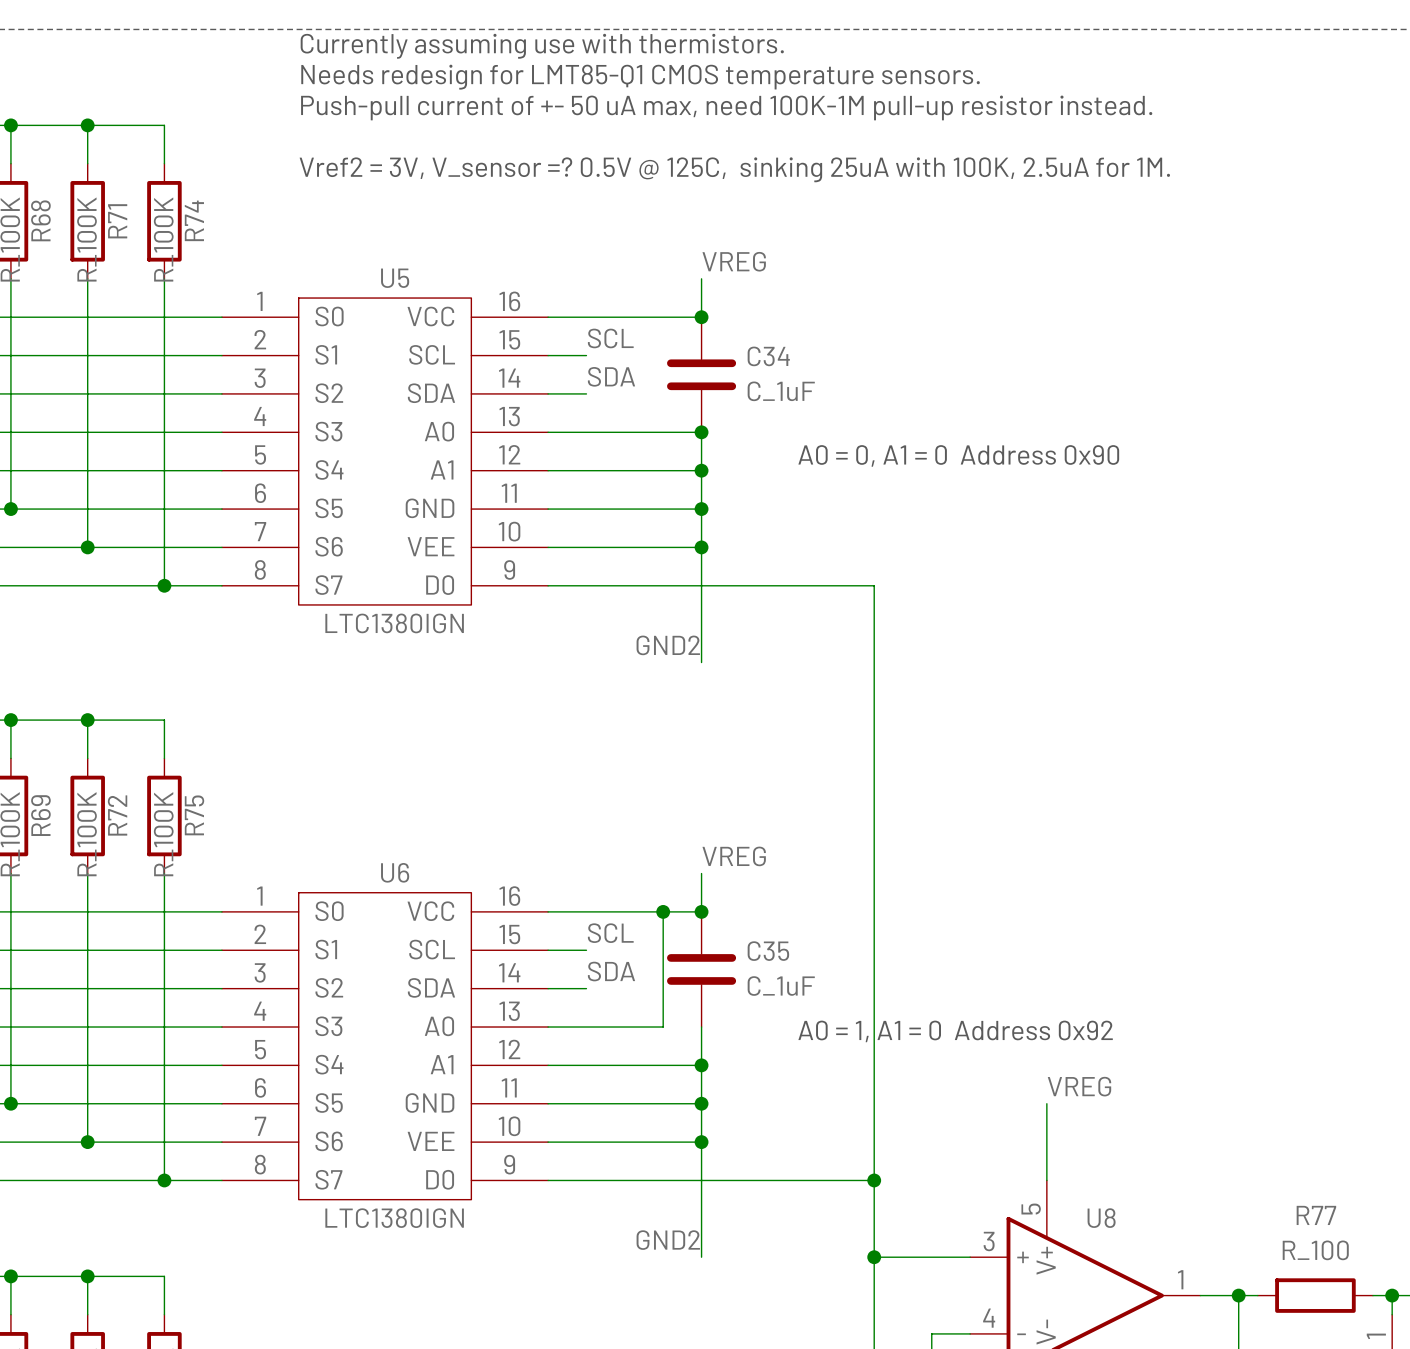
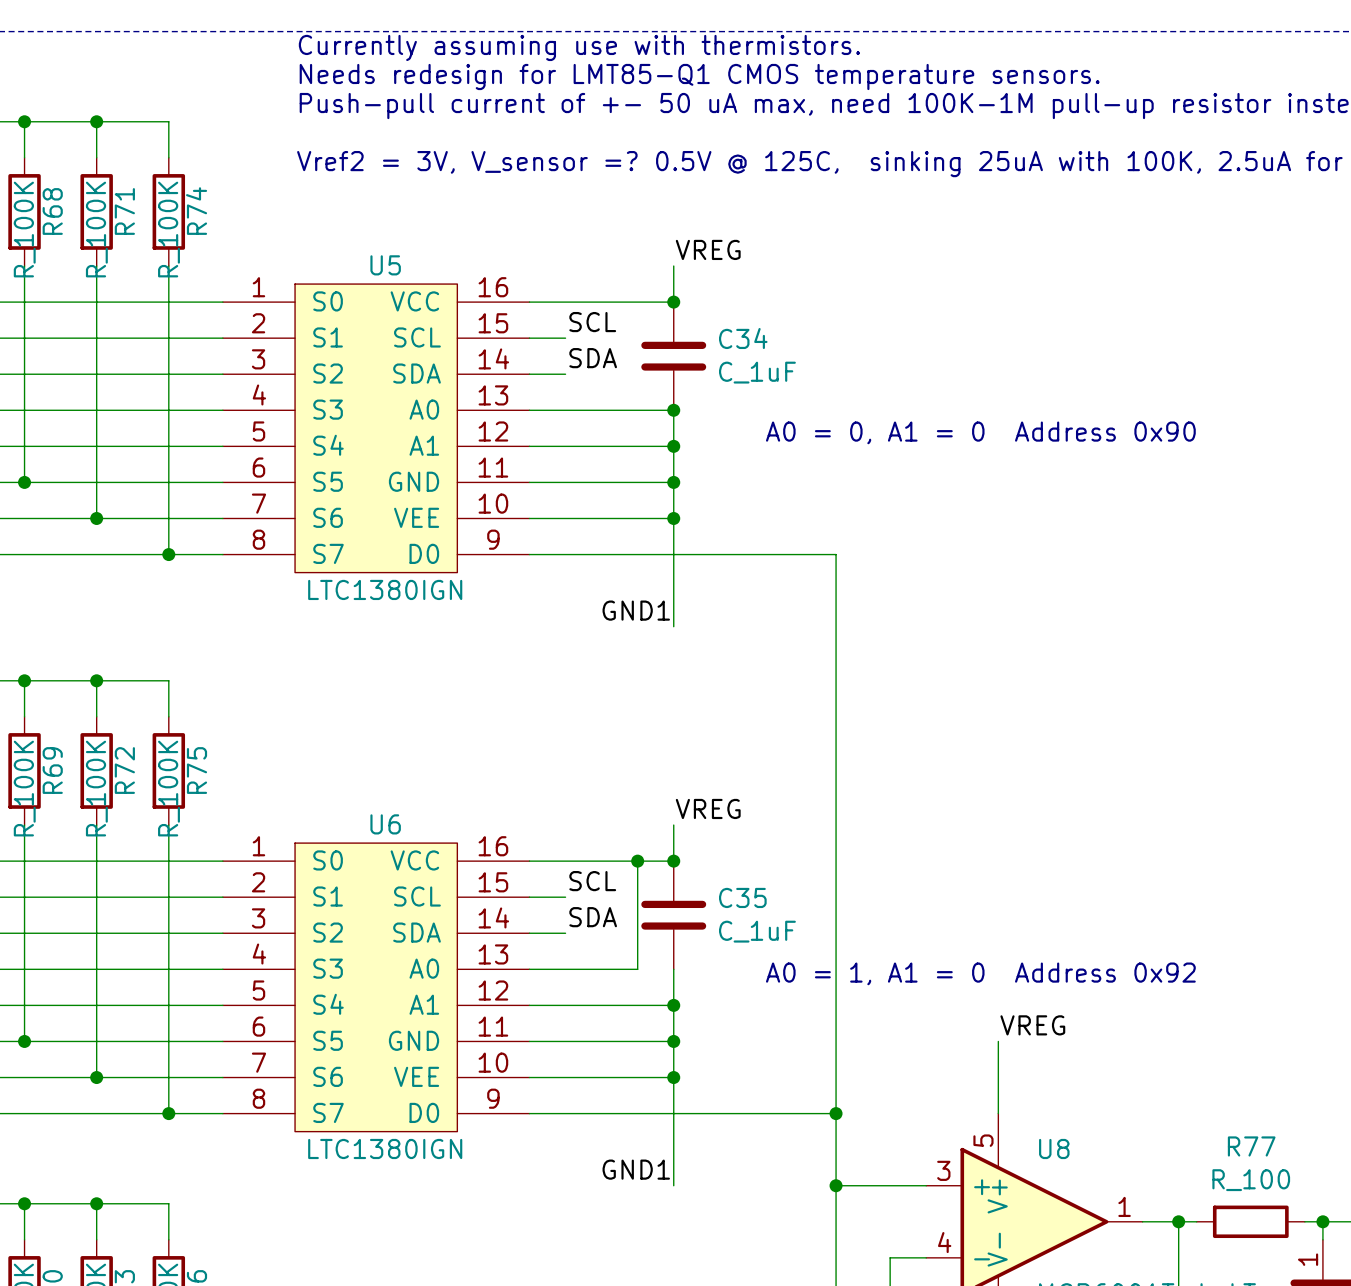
label: GND2 (668, 645) -> GND1 (636, 610)
label: GND2 (668, 1240) -> GND1 (636, 1169)

